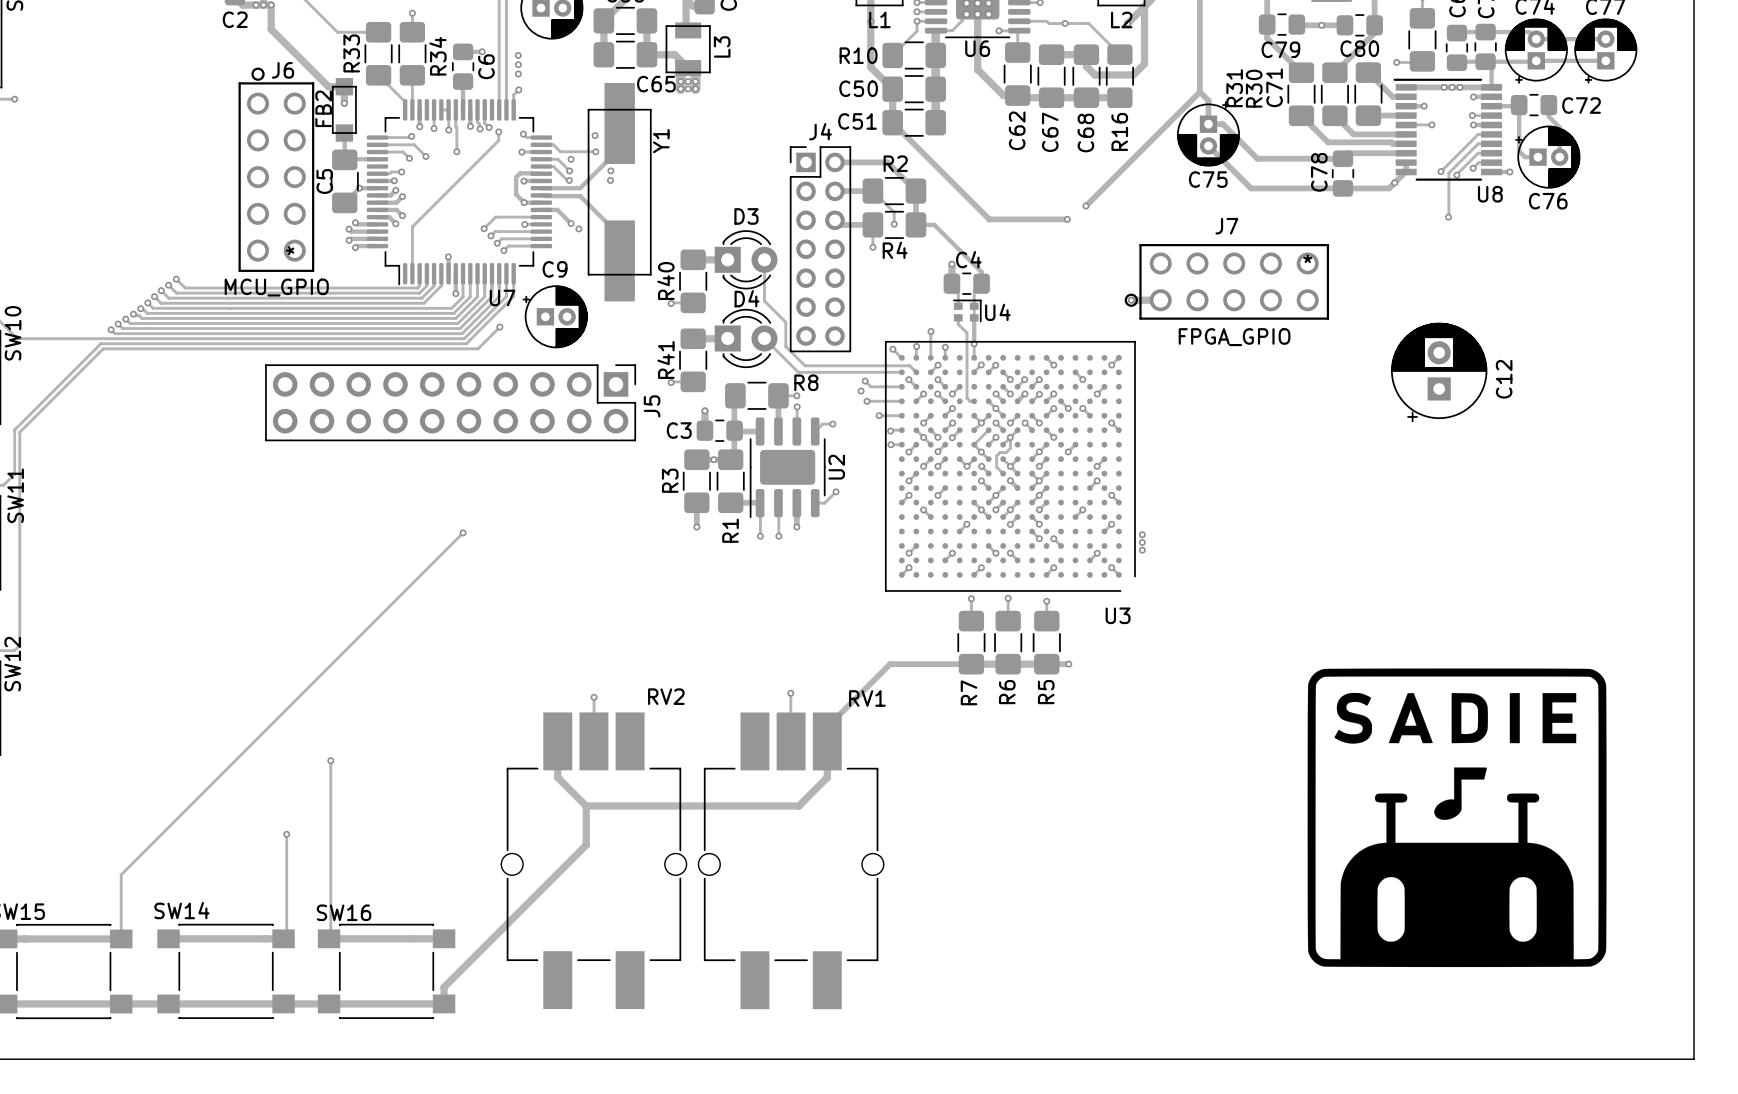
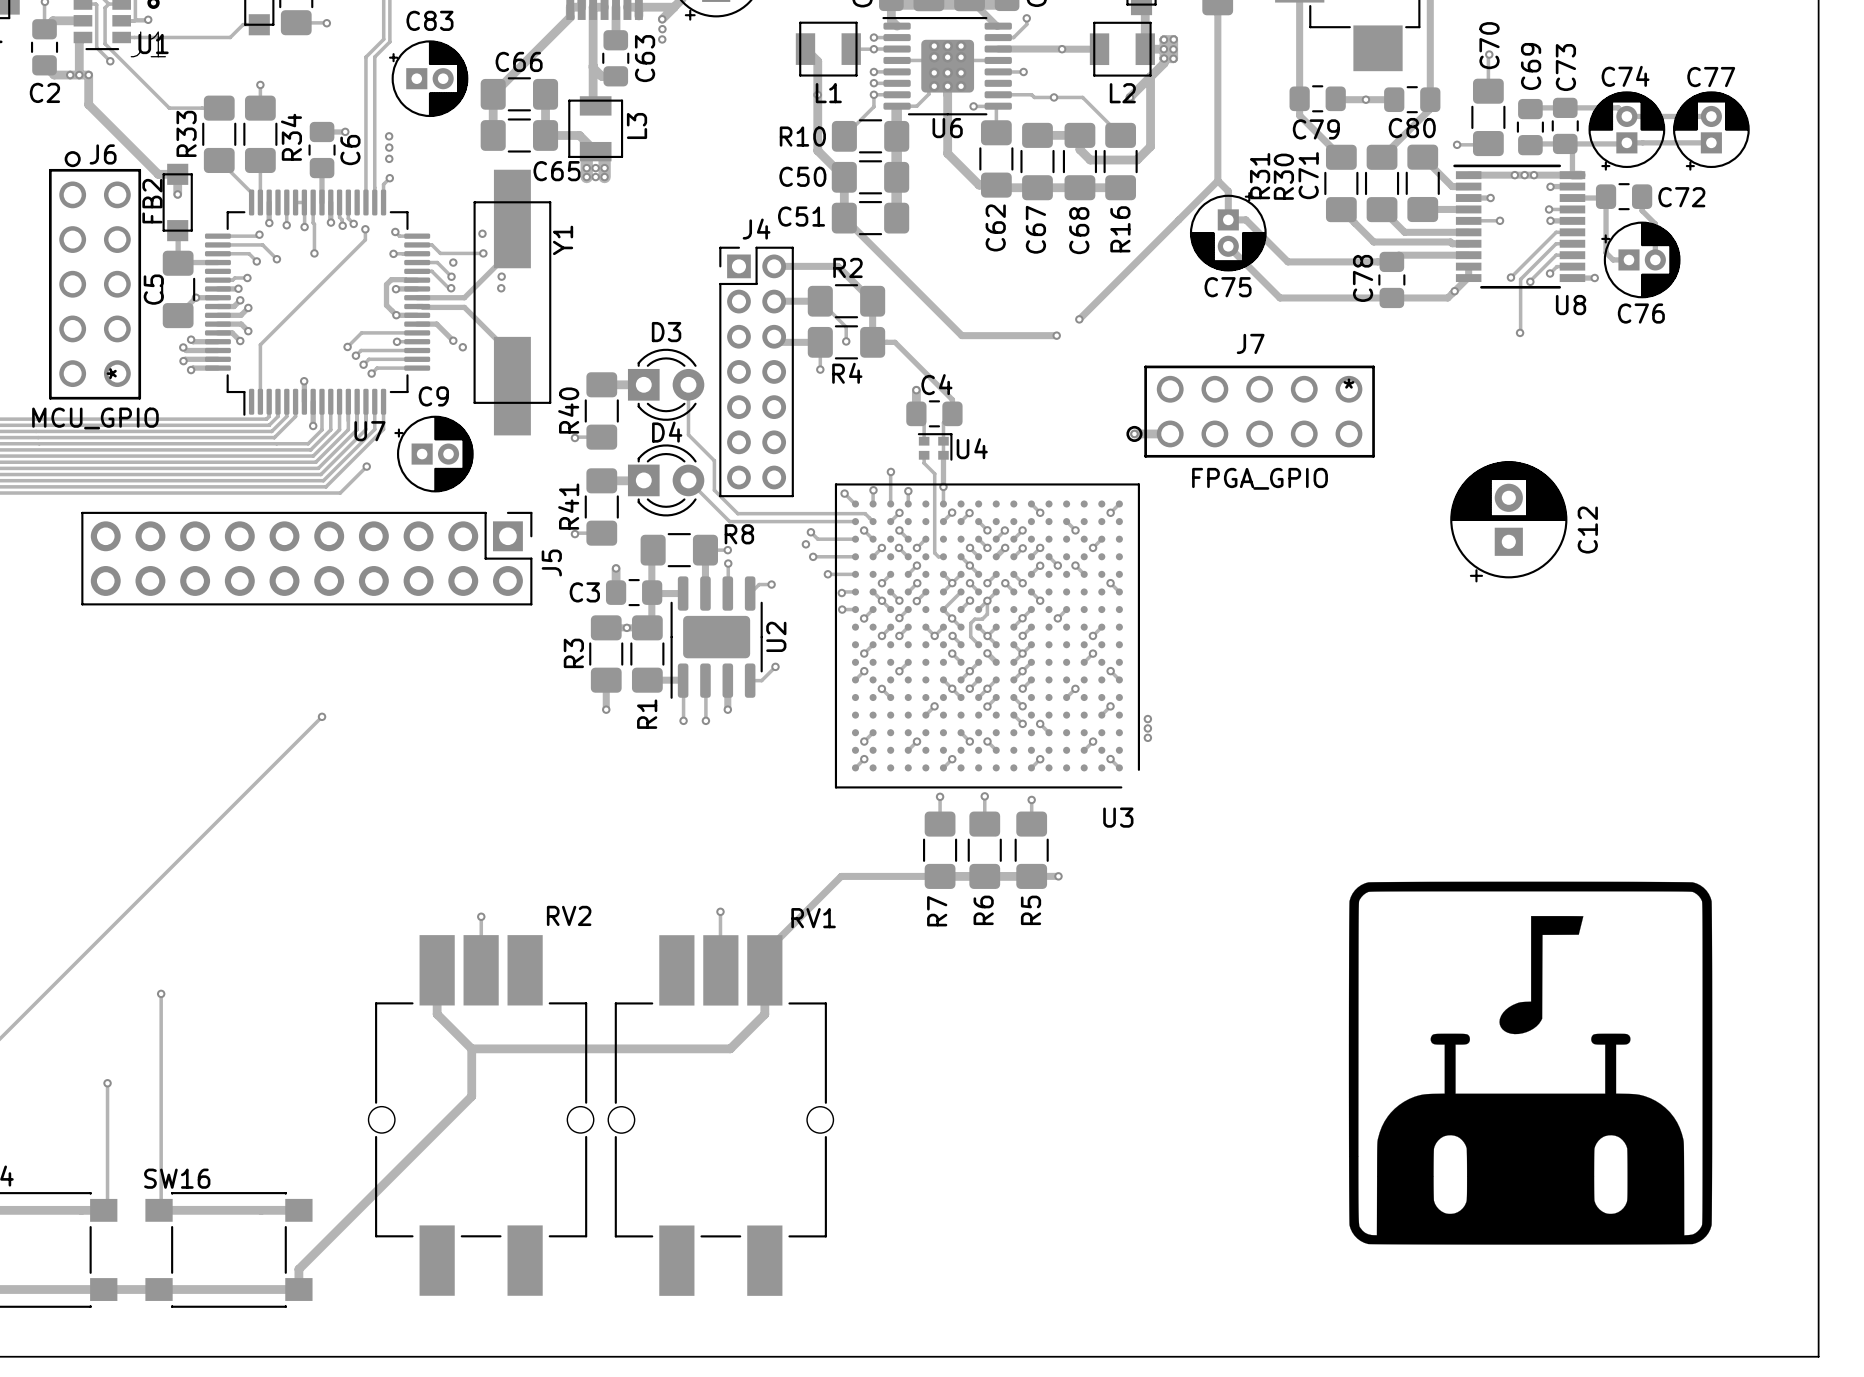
drawing shape: [1307, 668, 1607, 968] -> [1348, 881, 1713, 1245]

